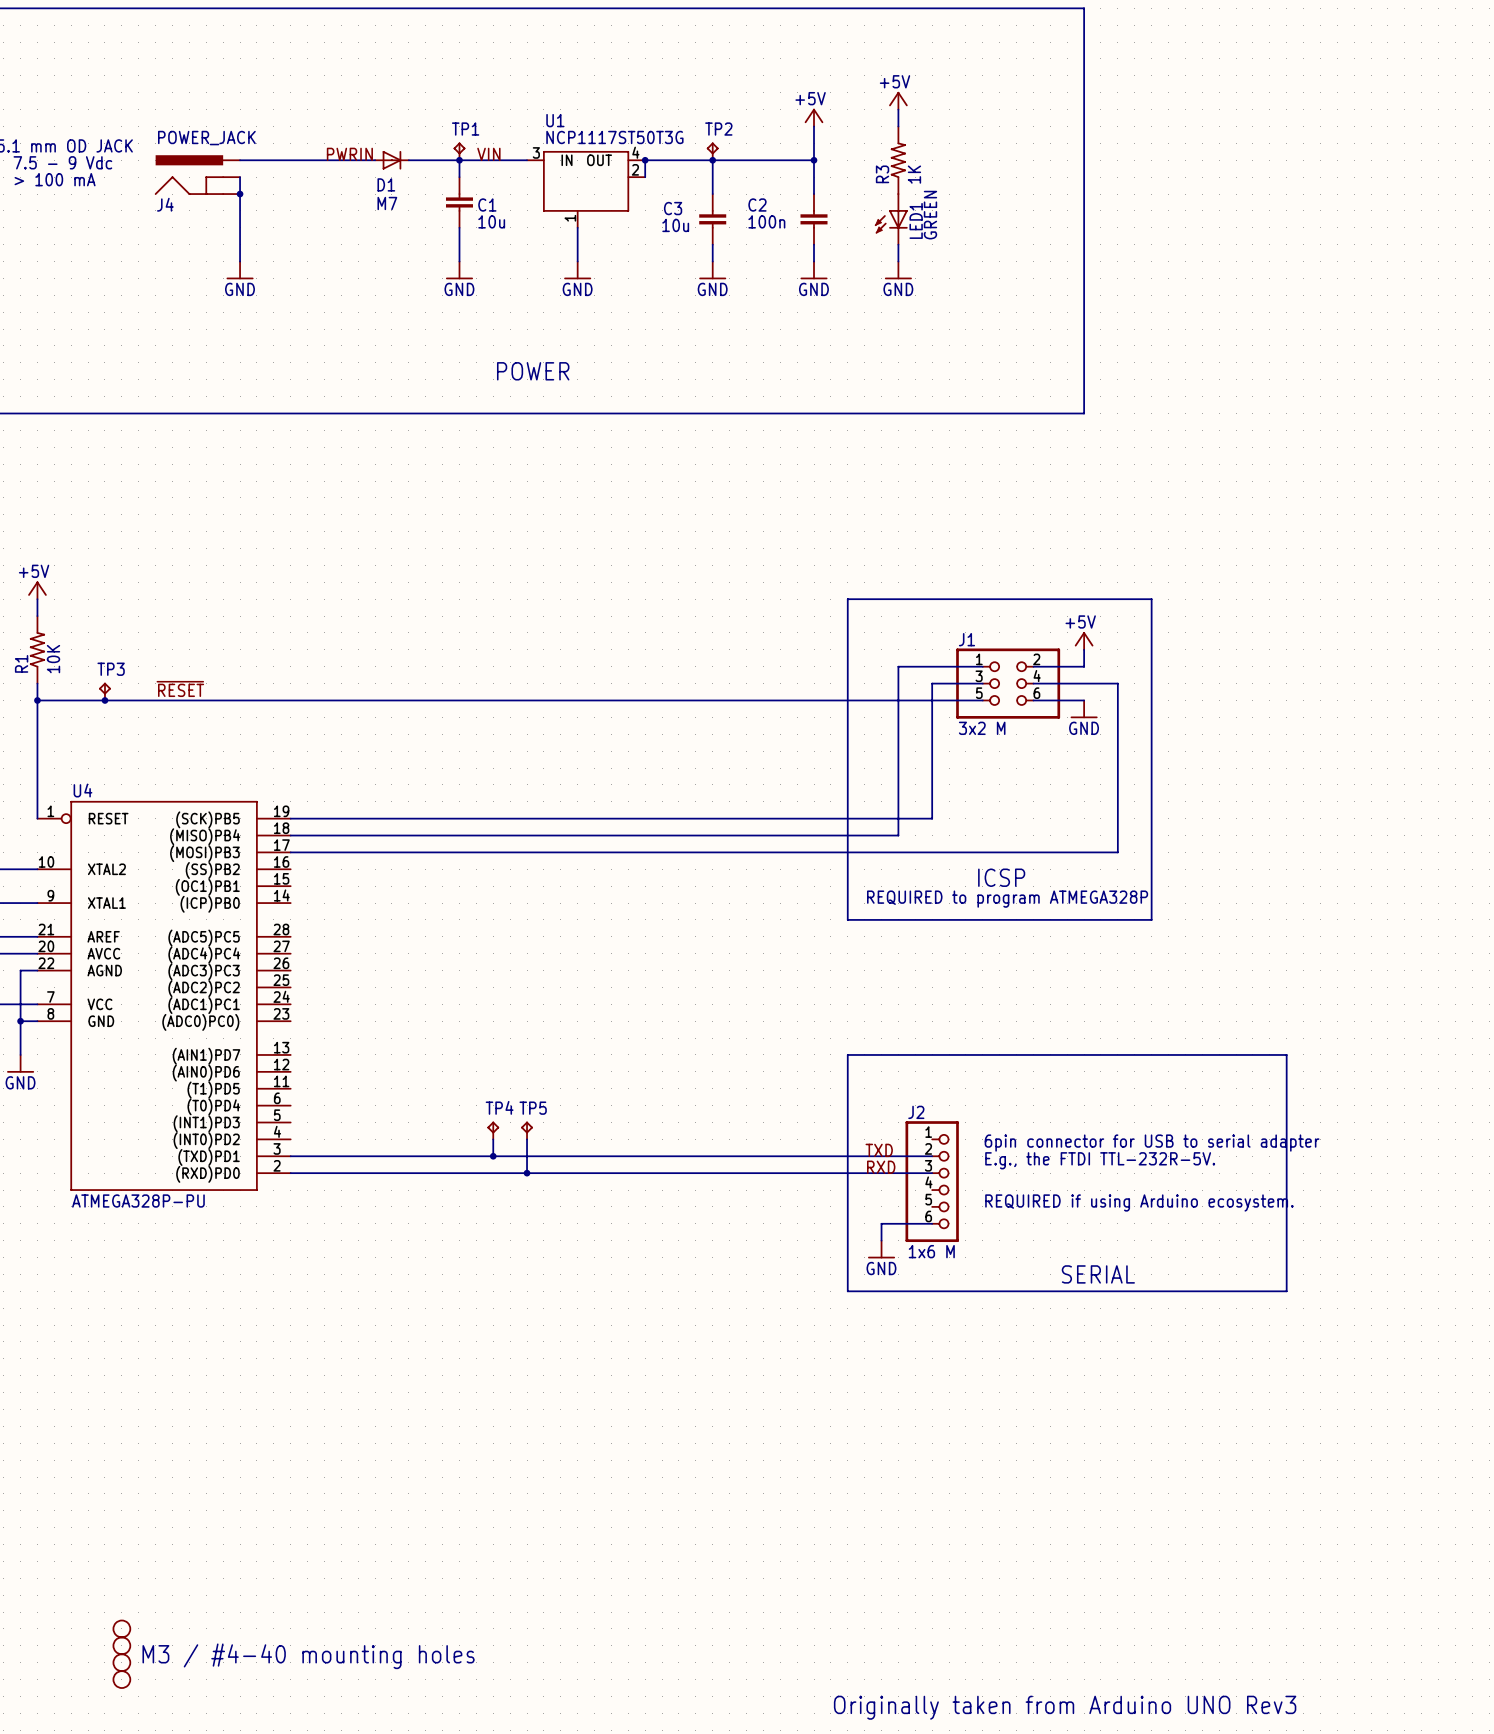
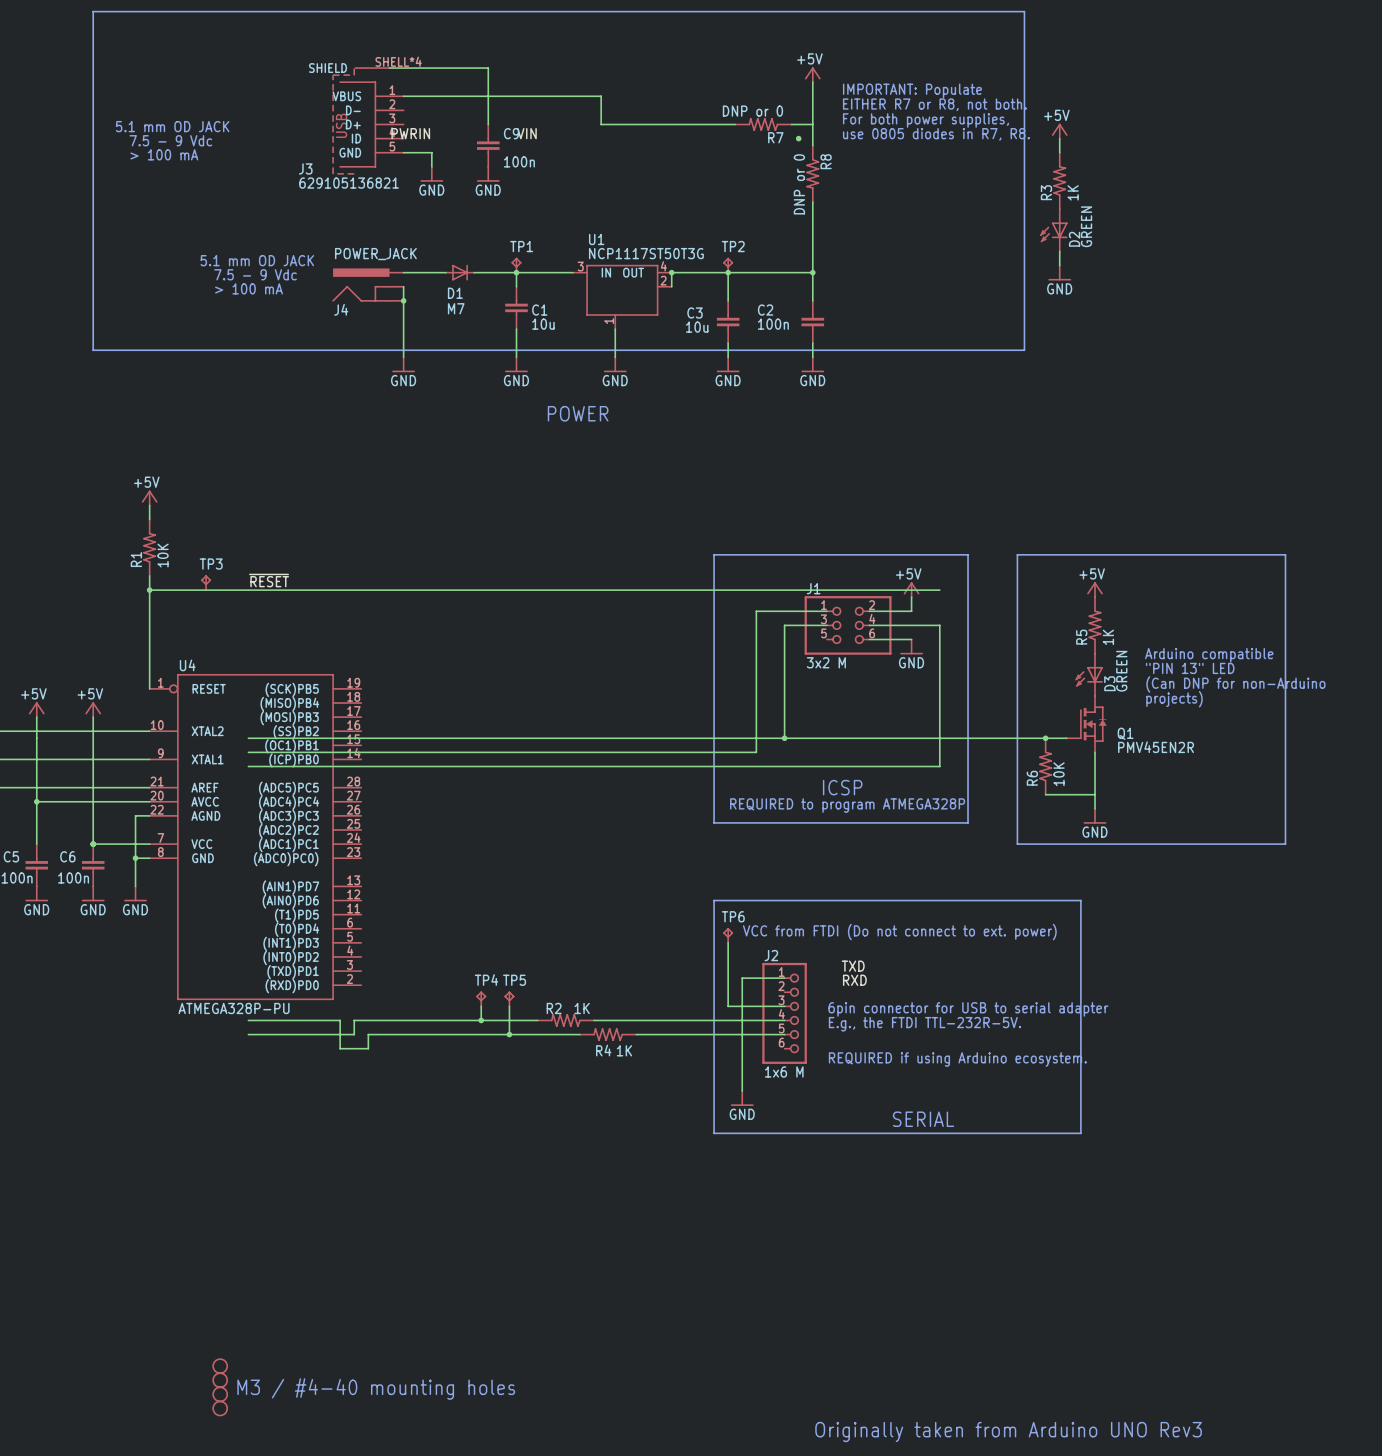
wire: none -> (389, 68) (488, 68) (488, 124)
power symbol: none -> +5V (812, 74)
wire: none -> (812, 82) (812, 145)
power symbol: +5V (898, 100) -> none
text: none -> IMPORTANT: Populate (912, 90)
wire: none -> (403, 96) (601, 96) (601, 124) (735, 124)
wire: (898, 109) (898, 126) -> none
power symbol: +5V (814, 117) -> none
text: none -> EITHER R7 or R8, not both. (934, 104)
wire: (814, 126) (814, 194) -> none
text: none -> For both power supplies, (925, 120)
J3: none -> 629105136821 (367, 120)
R7: none -> DNP or 0 (763, 124)
wire: none -> (791, 124) (812, 124)
TP1 position: (459, 151) -> (516, 265)
TP2 position: (712, 151) -> (728, 265)
power symbol: none -> +5V (1059, 131)
text: none -> use 0805 diodes in R7, R8. (936, 134)
wire: (240, 160) (375, 160) -> none
D1 position: (391, 160) -> (460, 272)
wire: (408, 160) (527, 160) -> (474, 272) (572, 272)
wire: (459, 160) (459, 177) -> (516, 272) (516, 286)
junction: (459, 160) -> none
junction: (645, 160) -> none
wire: (712, 160) (712, 194) -> (728, 272) (728, 300)
junction: (712, 160) -> none
wire: (814, 160) (645, 160) (645, 177) -> (812, 272) (671, 272) (671, 286)
R3 position: (898, 160) -> (1059, 180)
wire: none -> (1059, 138) (1059, 152)
C9: none -> 100n (488, 145)
J4 position: (197, 174) -> (368, 284)
wire: (240, 177) (240, 261) -> none
wire: none -> (403, 152) (431, 152) (431, 166)
U1 position: (586, 189) -> (622, 296)
junction: (240, 194) -> none
power symbol: none -> GND (431, 174)
power symbol: none -> GND (488, 174)
C1 position: (459, 202) -> (516, 307)
R8: none -> DNP or 0 (812, 173)
C3 position: (712, 219) -> (728, 322)
C2 position: (814, 219) -> (812, 322)
LED1: GREEN (891, 219) -> none
wire: (459, 227) (459, 261) -> (516, 329) (516, 357)
wire: (577, 227) (577, 261) -> (615, 329) (615, 357)
wire: none -> (812, 202) (812, 300)
wire: (712, 244) (712, 261) -> (728, 343) (728, 357)
wire: (814, 244) (814, 261) -> (812, 343) (812, 357)
wire: (898, 244) (898, 261) -> none
power symbol: GND (240, 270) -> none
power symbol: GND (459, 270) -> none
power symbol: GND (577, 270) -> none
power symbol: GND (712, 270) -> none
power symbol: GND (814, 270) -> none
power symbol: GND (898, 270) -> none
D2: none -> GREEN (1053, 230)
wire: none -> (1059, 251) (1059, 265)
text: none -> 5.1 mm OD JACK (257, 260)
wire: none -> (403, 272) (445, 272)
junction: none -> (516, 272)
junction: none -> (671, 272)
junction: none -> (728, 272)
junction: none -> (812, 272)
power symbol: none -> GND (1059, 273)
text: none -> 7.5 - 9 Vdc (255, 274)
wire: none -> (403, 286) (403, 357)
text: none -> > 100 mA (249, 288)
junction: none -> (403, 300)
text position: POWER (533, 371) -> POWER (578, 413)
power symbol: none -> GND (403, 364)
power symbol: none -> GND (516, 364)
power symbol: none -> GND (615, 364)
power symbol: none -> GND (728, 364)
power symbol: none -> GND (812, 364)
line: (847, 599) (847, 919) (1151, 919) (1151, 599) (847, 599) -> (714, 554) (714, 822) (968, 822) (968, 554) (714, 554)
power symbol: +5V (1084, 640) -> none
wire: (1084, 649) (1084, 666) (1033, 666) -> (911, 597) (911, 611) (869, 611)
line: none -> (1017, 554) (1285, 554) (1285, 844) (1017, 844) (1017, 554)
wire: (982, 666) (898, 666) (898, 835) (290, 835) -> (826, 611) (756, 611) (756, 752) (248, 752)
wire: (982, 683) (932, 683) (932, 818) (290, 818) -> none
J1 position: (1008, 683) -> (848, 625)
wire: (1033, 683) (1117, 683) (1117, 852) (290, 852) -> (869, 625) (939, 625) (939, 766) (248, 766)
junction: (104, 700) -> none
power symbol: none -> +5V (911, 589)
wire: (1033, 700) (1084, 700) -> (869, 639) (911, 639)
power symbol: none -> +5V (1095, 589)
power symbol: GND (1084, 709) -> none
wire: none -> (826, 625) (784, 625) (784, 738)
R5: none -> 1K (1095, 625)
power symbol: none -> GND (911, 646)
text: none -> Arduino compatible (1209, 655)
text: none -> "PIN 13" LED (1190, 668)
D3: none -> GREEN (1089, 674)
text: none -> (Can DNP for non-Arduino (1235, 684)
text: none -> projects) (1174, 699)
Q1: none -> PMV45EN2R (1086, 724)
wire: none -> (248, 738) (1066, 738)
junction: none -> (784, 738)
text position: ICSP (1001, 877) -> ICSP (842, 787)
junction: none -> (1045, 738)
wire: none -> (1095, 752) (1095, 808)
text position: REQUIRED to program ATMEGA328P (1007, 899) -> REQUIRED to program ATMEGA328P (847, 805)
R6: none -> 10K (1045, 766)
wire: none -> (1045, 794) (1095, 794)
power symbol: none -> GND (1095, 816)
line: (847, 1054) (847, 1291) (1286, 1291) (1286, 1054) (847, 1054) -> none
line: none -> (714, 900) (714, 1133) (1080, 1133) (1080, 900) (714, 900)
text: none -> VCC from FTDI (Do not connect to ext. power) (899, 932)
TP6: none -> (728, 935)
wire: none -> (728, 942) (728, 1006) (784, 1006)
TP4 position: (493, 1130) -> (481, 998)
TP5 position: (527, 1130) -> (509, 998)
wire: (493, 1139) (493, 1156) -> (481, 1006) (481, 1020)
wire: (527, 1139) (527, 1173) -> (509, 1006) (509, 1034)
text position: 6pin connector for USB to serial adapter (1152, 1143) -> 6pin connector for USB to serial adapter (968, 1009)
wire: (290, 1156) (932, 1156) -> none
junction: (493, 1156) -> none
text position: E.g., the FTDI TTL-232R-5V. (1100, 1160) -> E.g., the FTDI TTL-232R-5V. (925, 1024)
wire: none -> (784, 978) (742, 978) (742, 1091)
wire: (290, 1173) (932, 1173) -> none
junction: (527, 1173) -> none
J2 position: (932, 1181) -> (784, 1013)
text position: REQUIRED if using Arduino ecosystem. (1139, 1202) -> REQUIRED if using Arduino ecosystem. (957, 1059)
wire: none -> (248, 1020) (340, 1020) (340, 1048) (368, 1048) (368, 1034) (579, 1034)
junction: none -> (481, 1020)
wire: none -> (537, 1020) (354, 1020) (354, 1034) (248, 1034)
R2: none -> 1K (565, 1020)
wire: none -> (594, 1020) (784, 1020)
wire: (932, 1223) (881, 1223) (881, 1240) -> none
junction: none -> (509, 1034)
R4: none -> 1K (608, 1034)
wire: none -> (636, 1034) (784, 1034)
power symbol position: GND (881, 1249) -> GND (742, 1098)
text position: SERIAL (1098, 1274) -> SERIAL (923, 1119)

